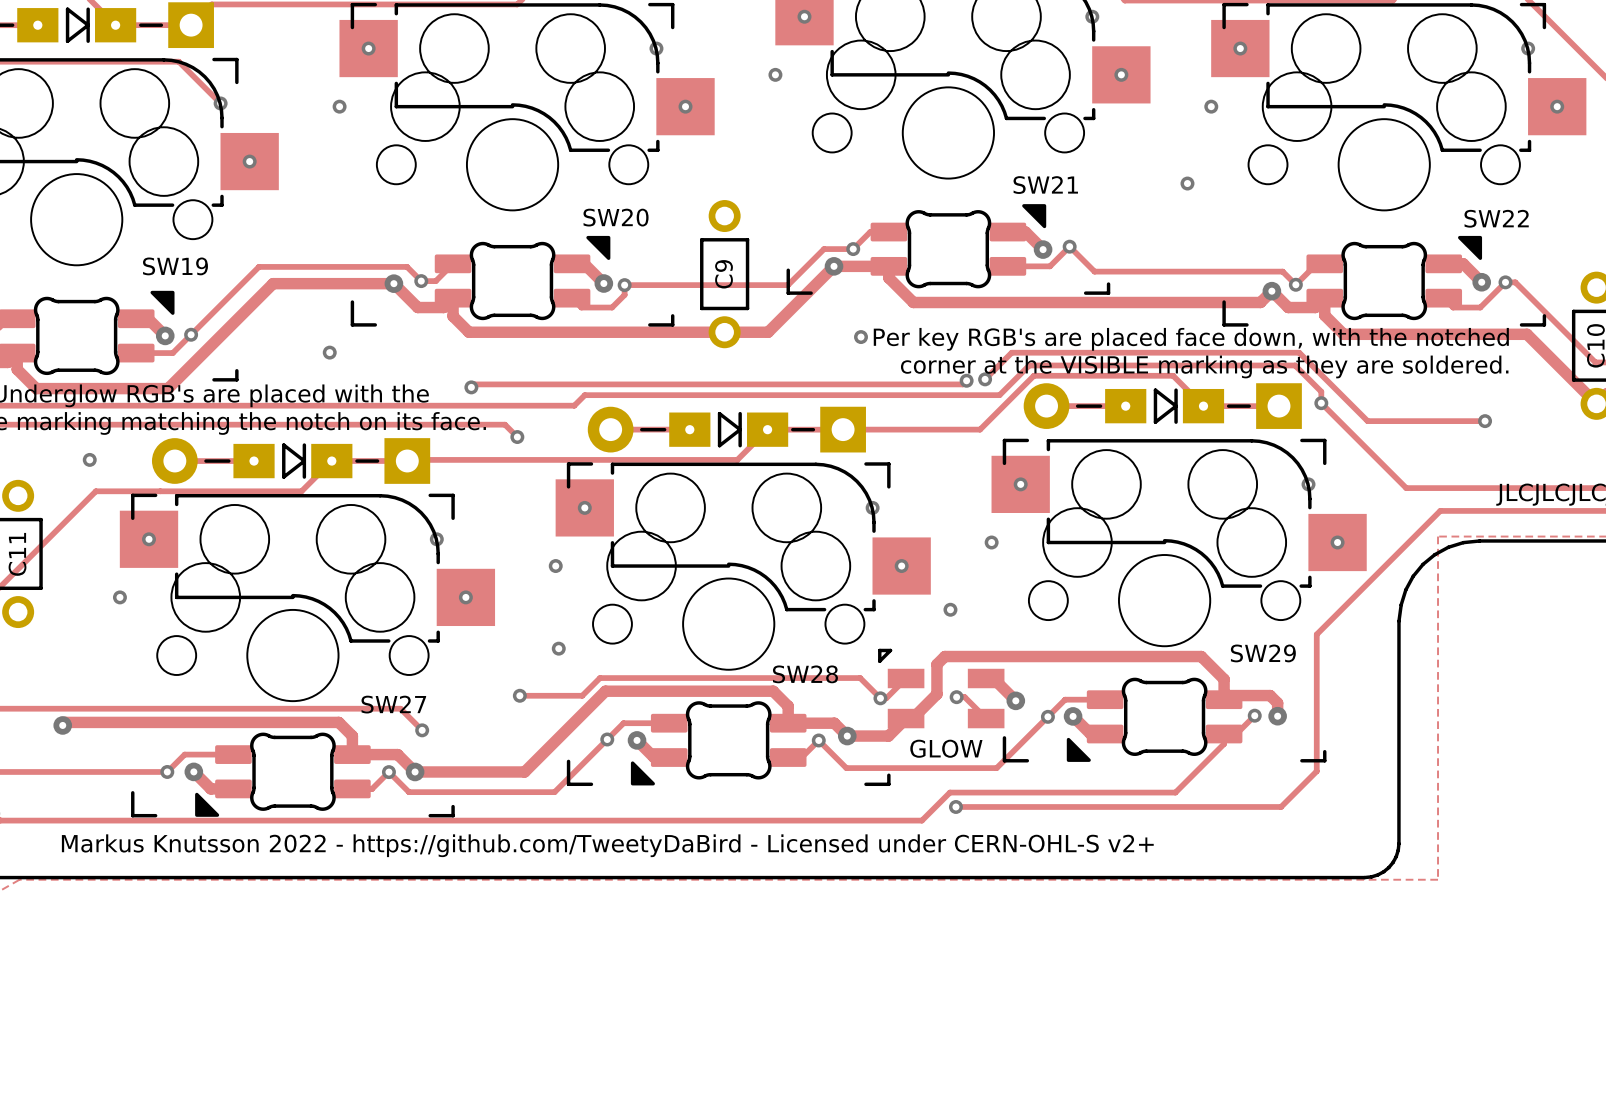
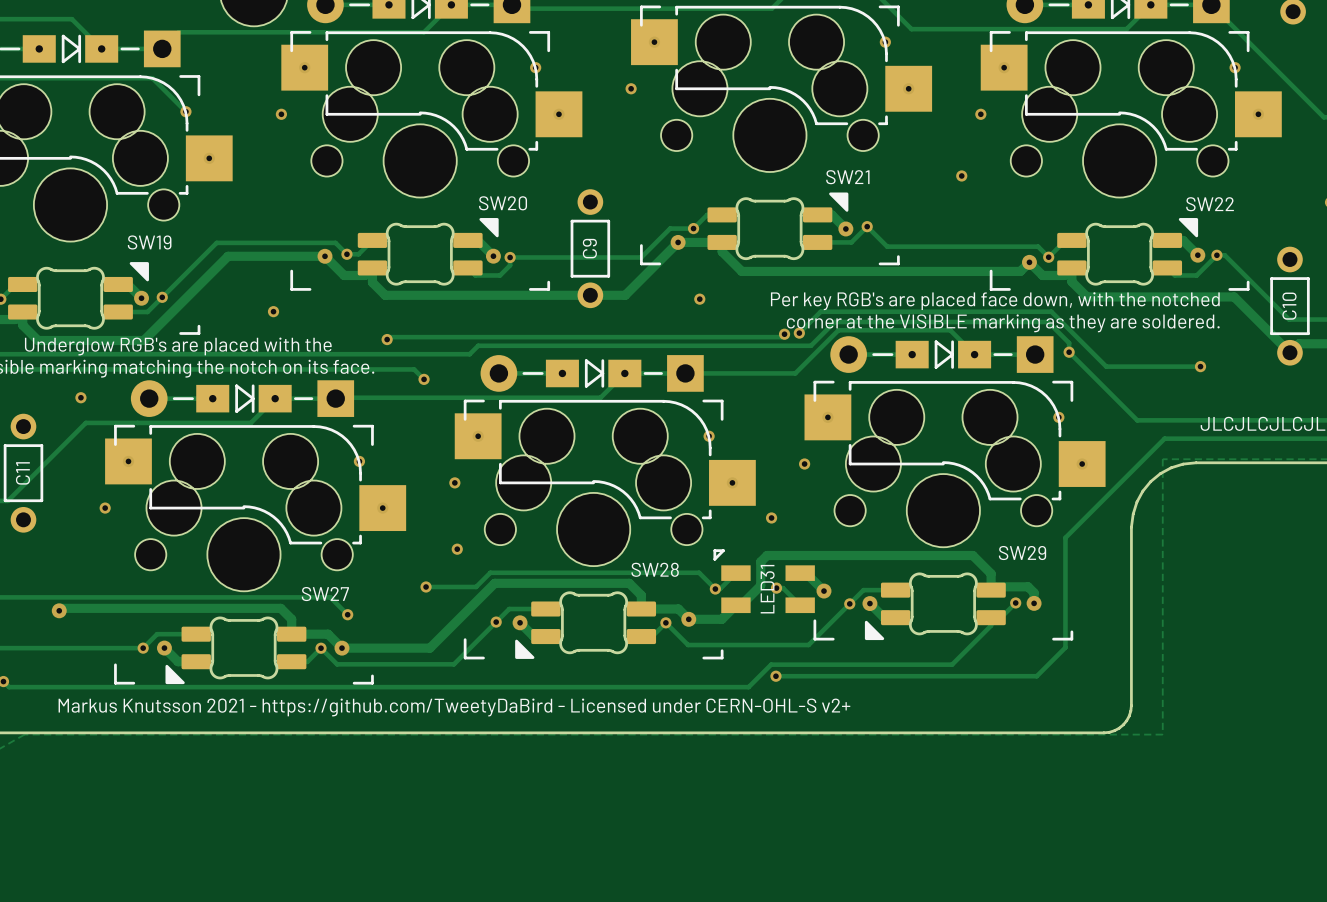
LED31 name: none -> LED31 (767, 589)
LED31 text: GLOW (946, 748) -> none
text: Markus Knutsson 2022 - https://github.com/TweetyDaBird - Licensed under CERN-OHL-S v2+ (607, 845) -> Markus Knutsson 2021 - https://github.com/TweetyDaBird - Licensed under CERN-OHL-S v2+ (454, 707)

